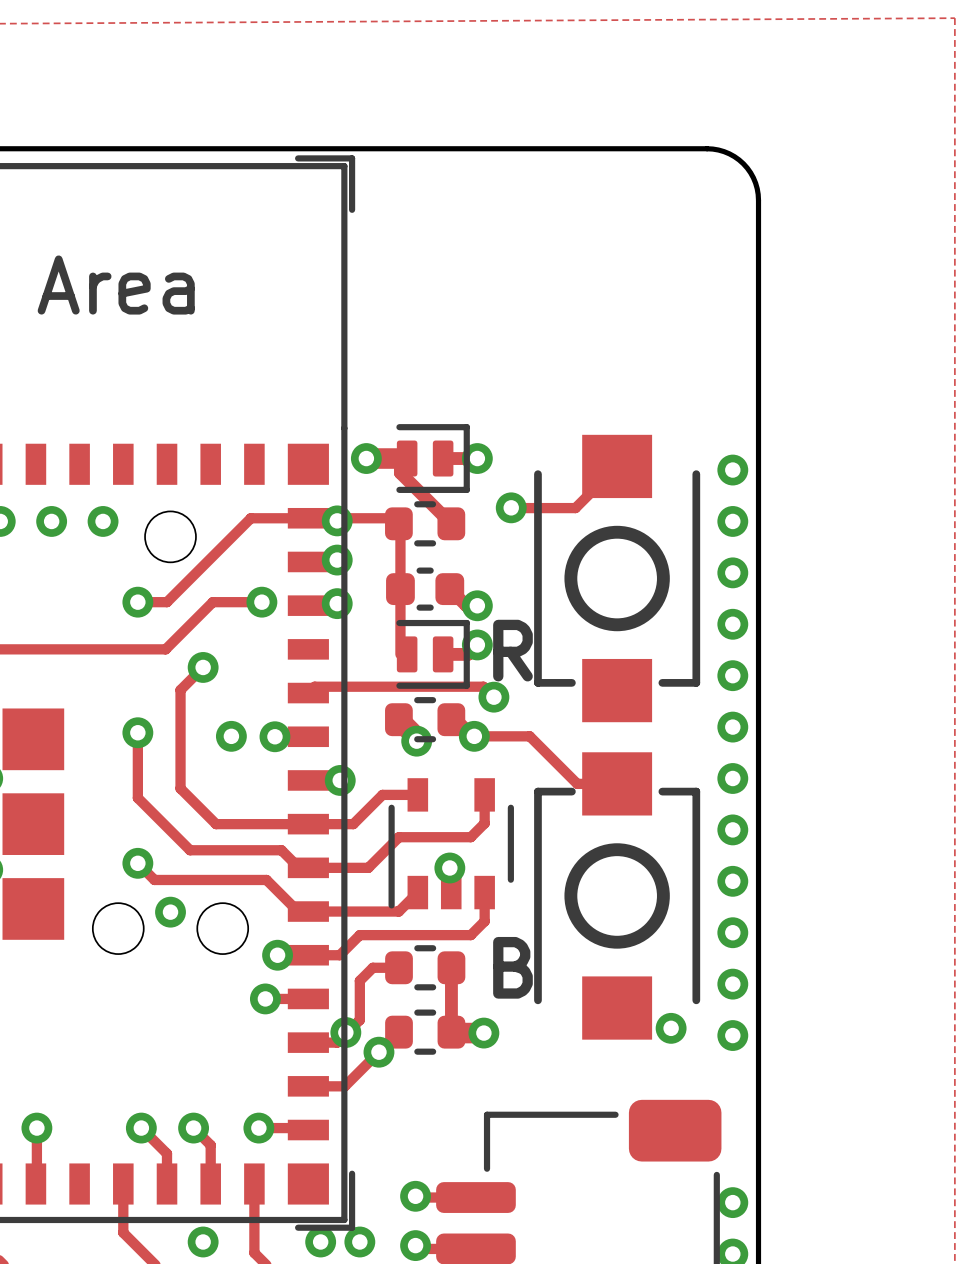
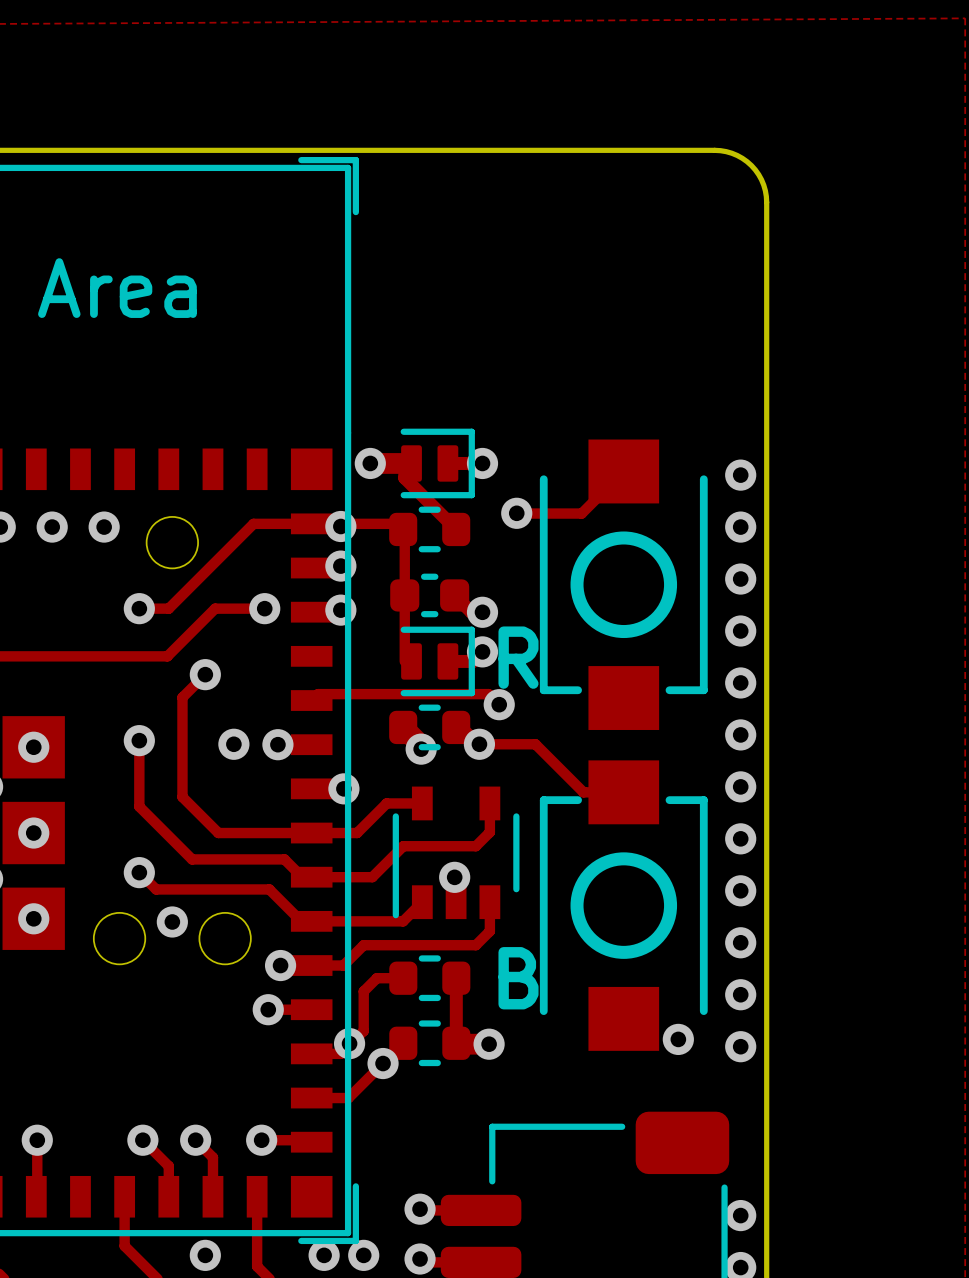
via: none -> (33, 747)
via: none -> (33, 833)
via: none -> (33, 918)

